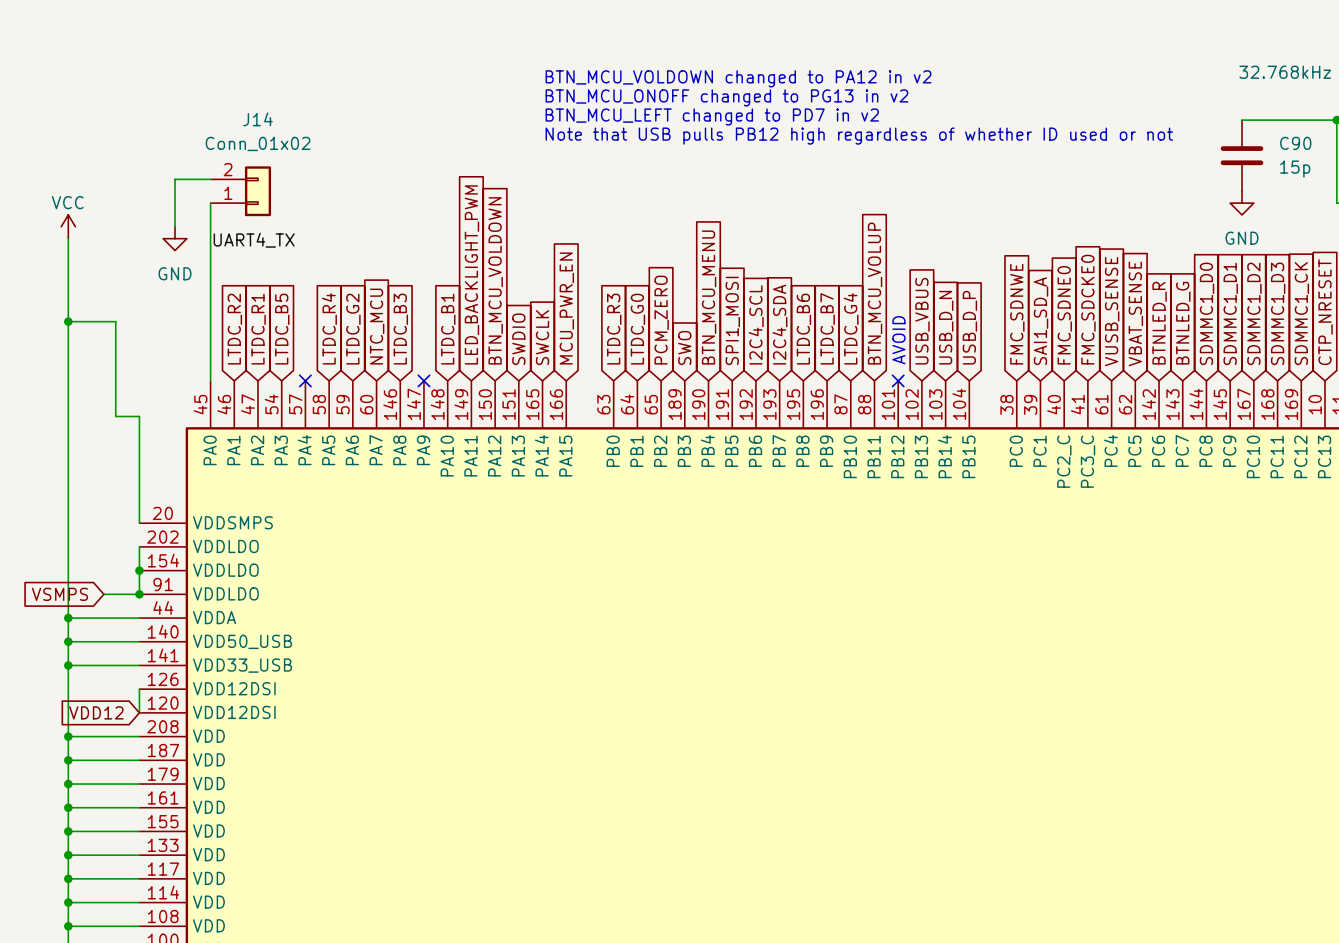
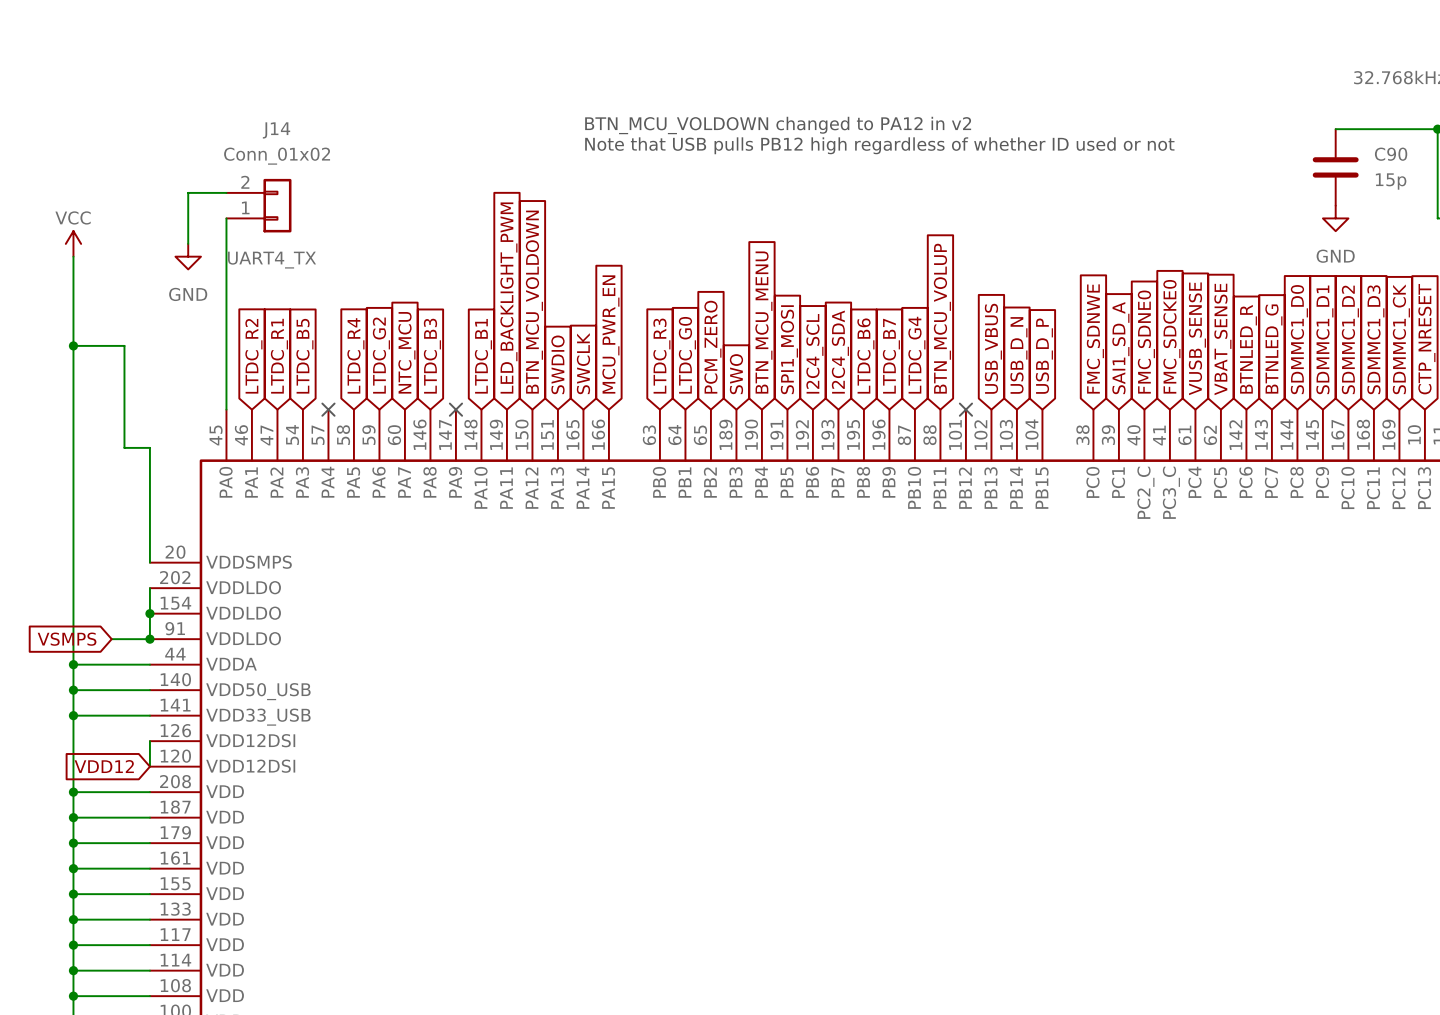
text: BTN_MCU_VOLDOWN changed to PA12 in v2 (738, 78) -> none
text: BTN_MCU_ONOFF changed to PG13 in v2 (726, 97) -> none
text: BTN_MCU_LEFT changed to PD7 in v2 (712, 117) -> BTN_MCU_VOLDOWN changed to PA12 in v2 (778, 125)
text: AVOID (898, 340) -> none

